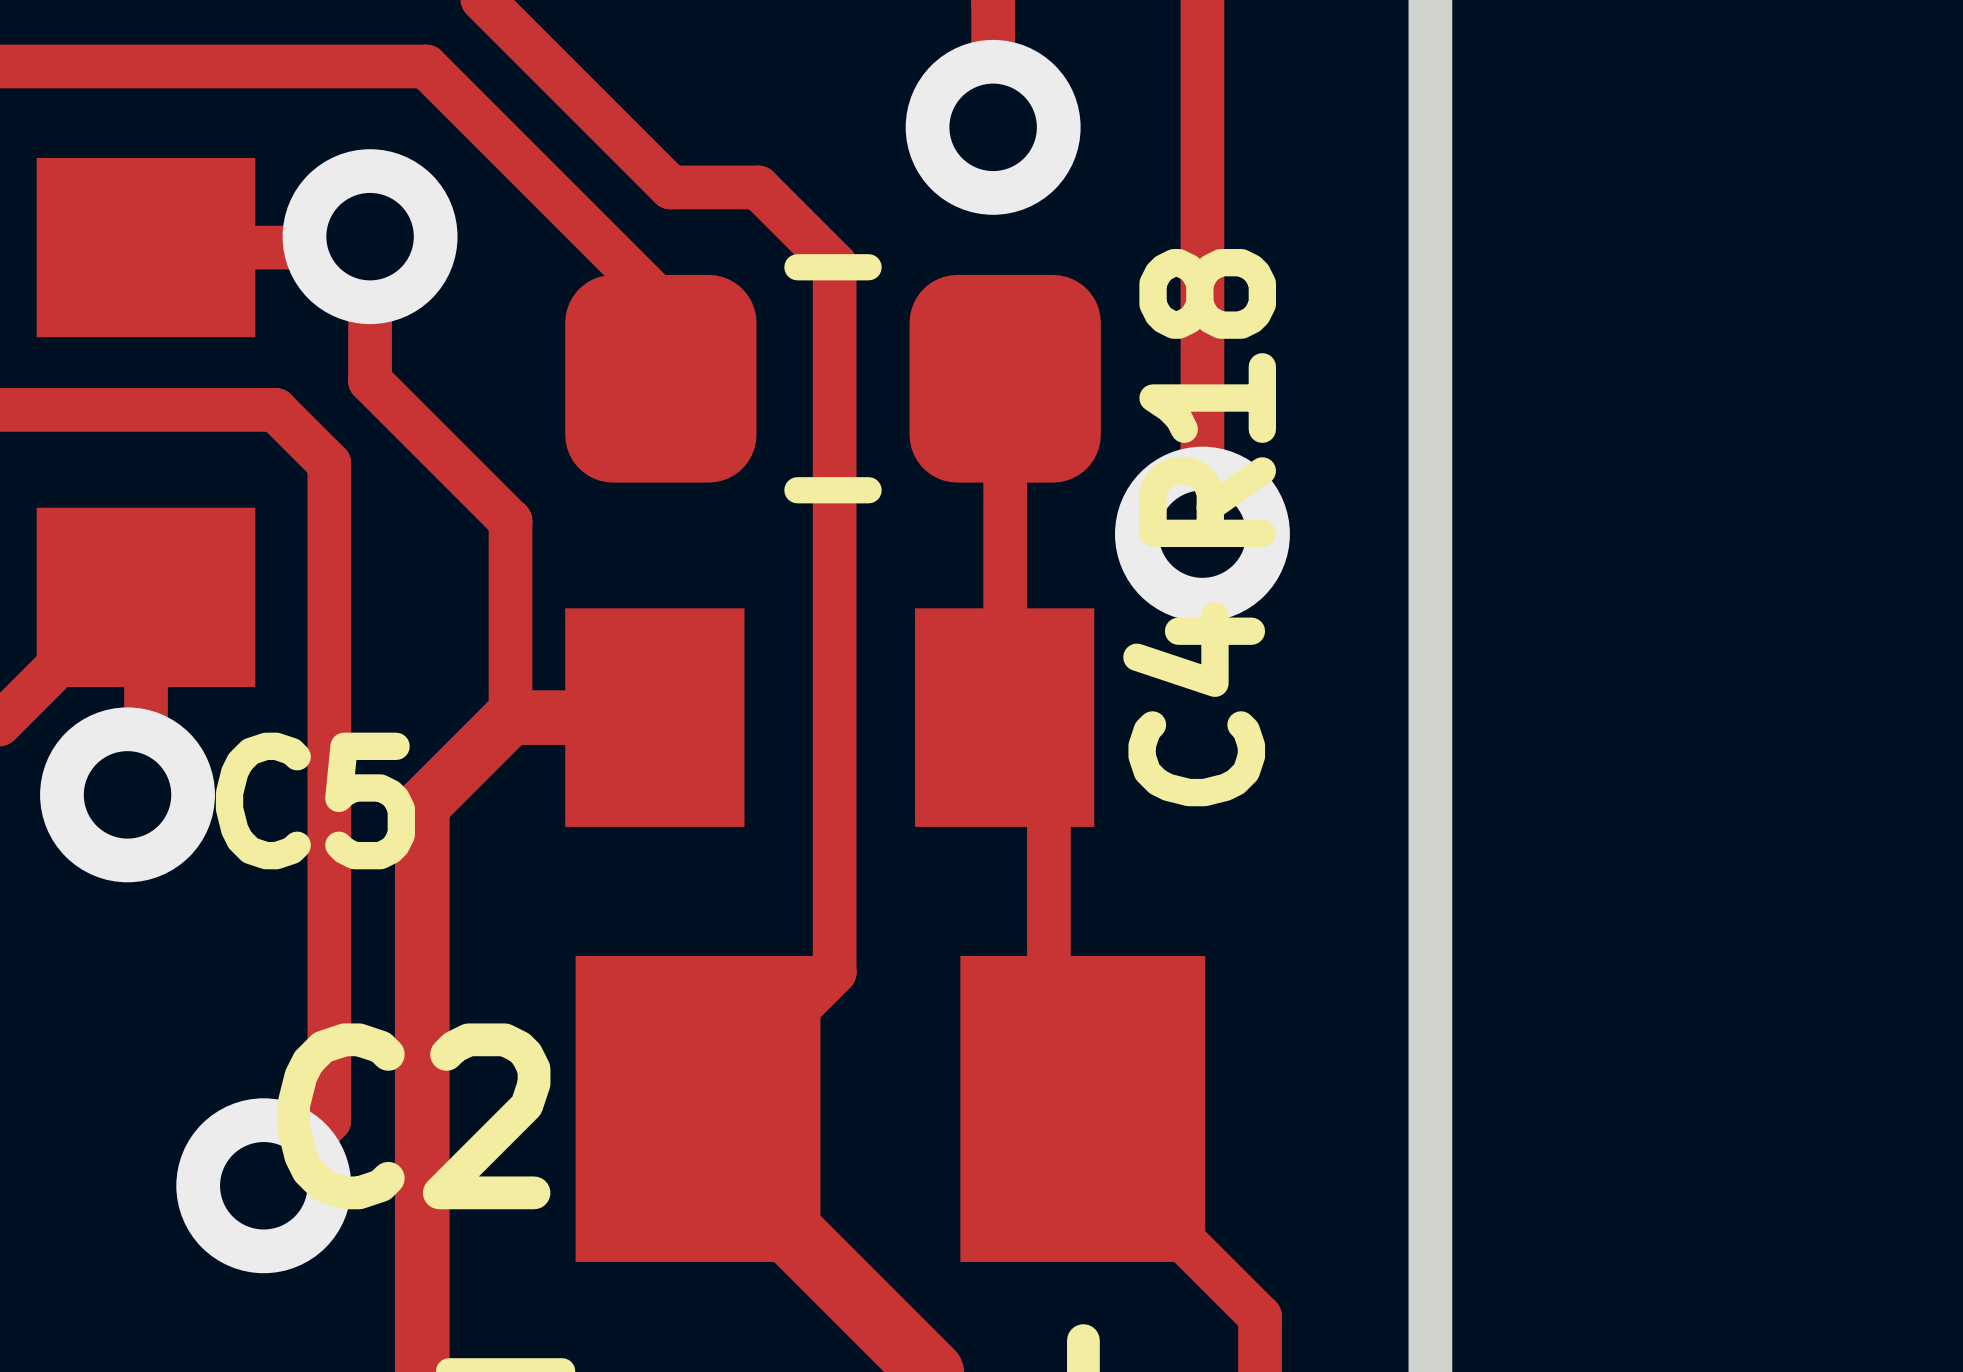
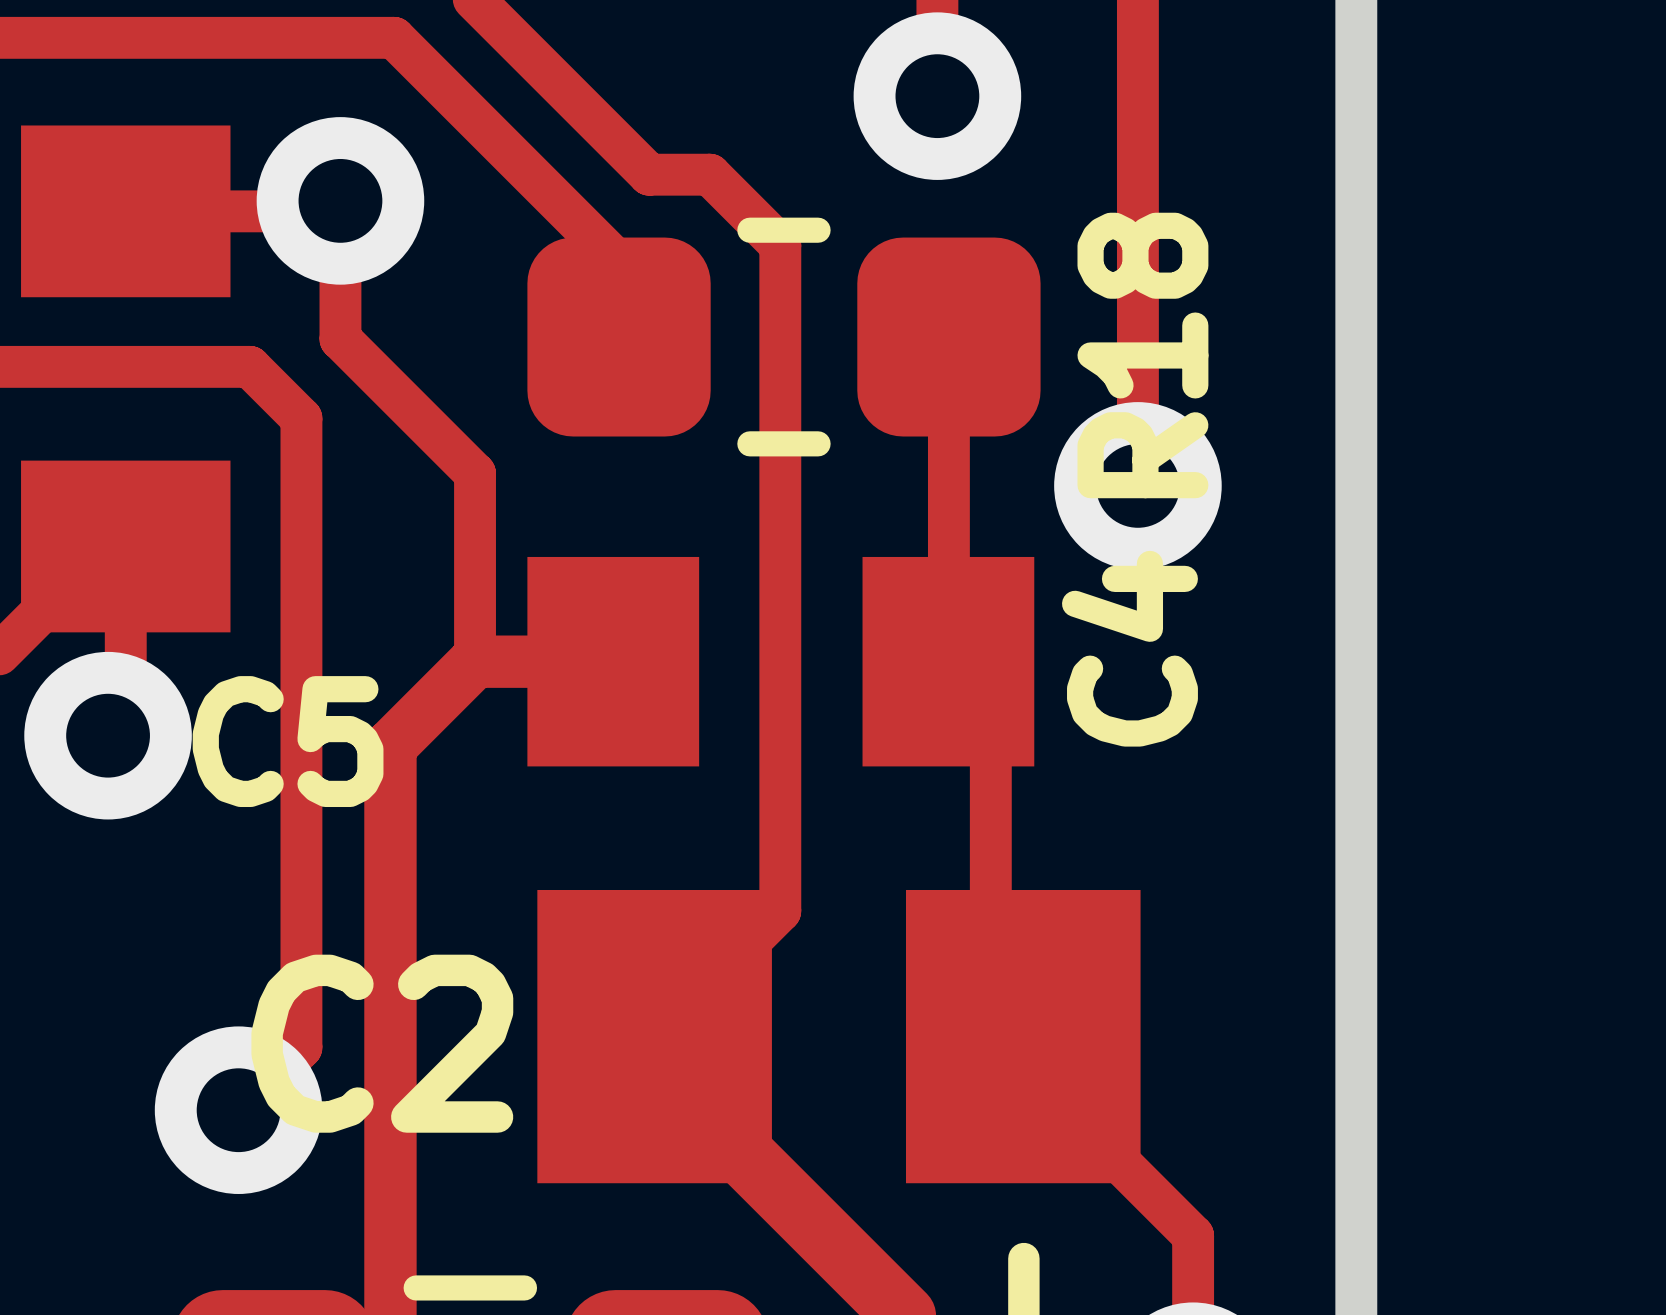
track: (670, 187) (758, 187) (834, 263) (834, 972) (829, 977) -> (628, 153) (649, 174) (709, 174) (780, 245) (780, 910)

